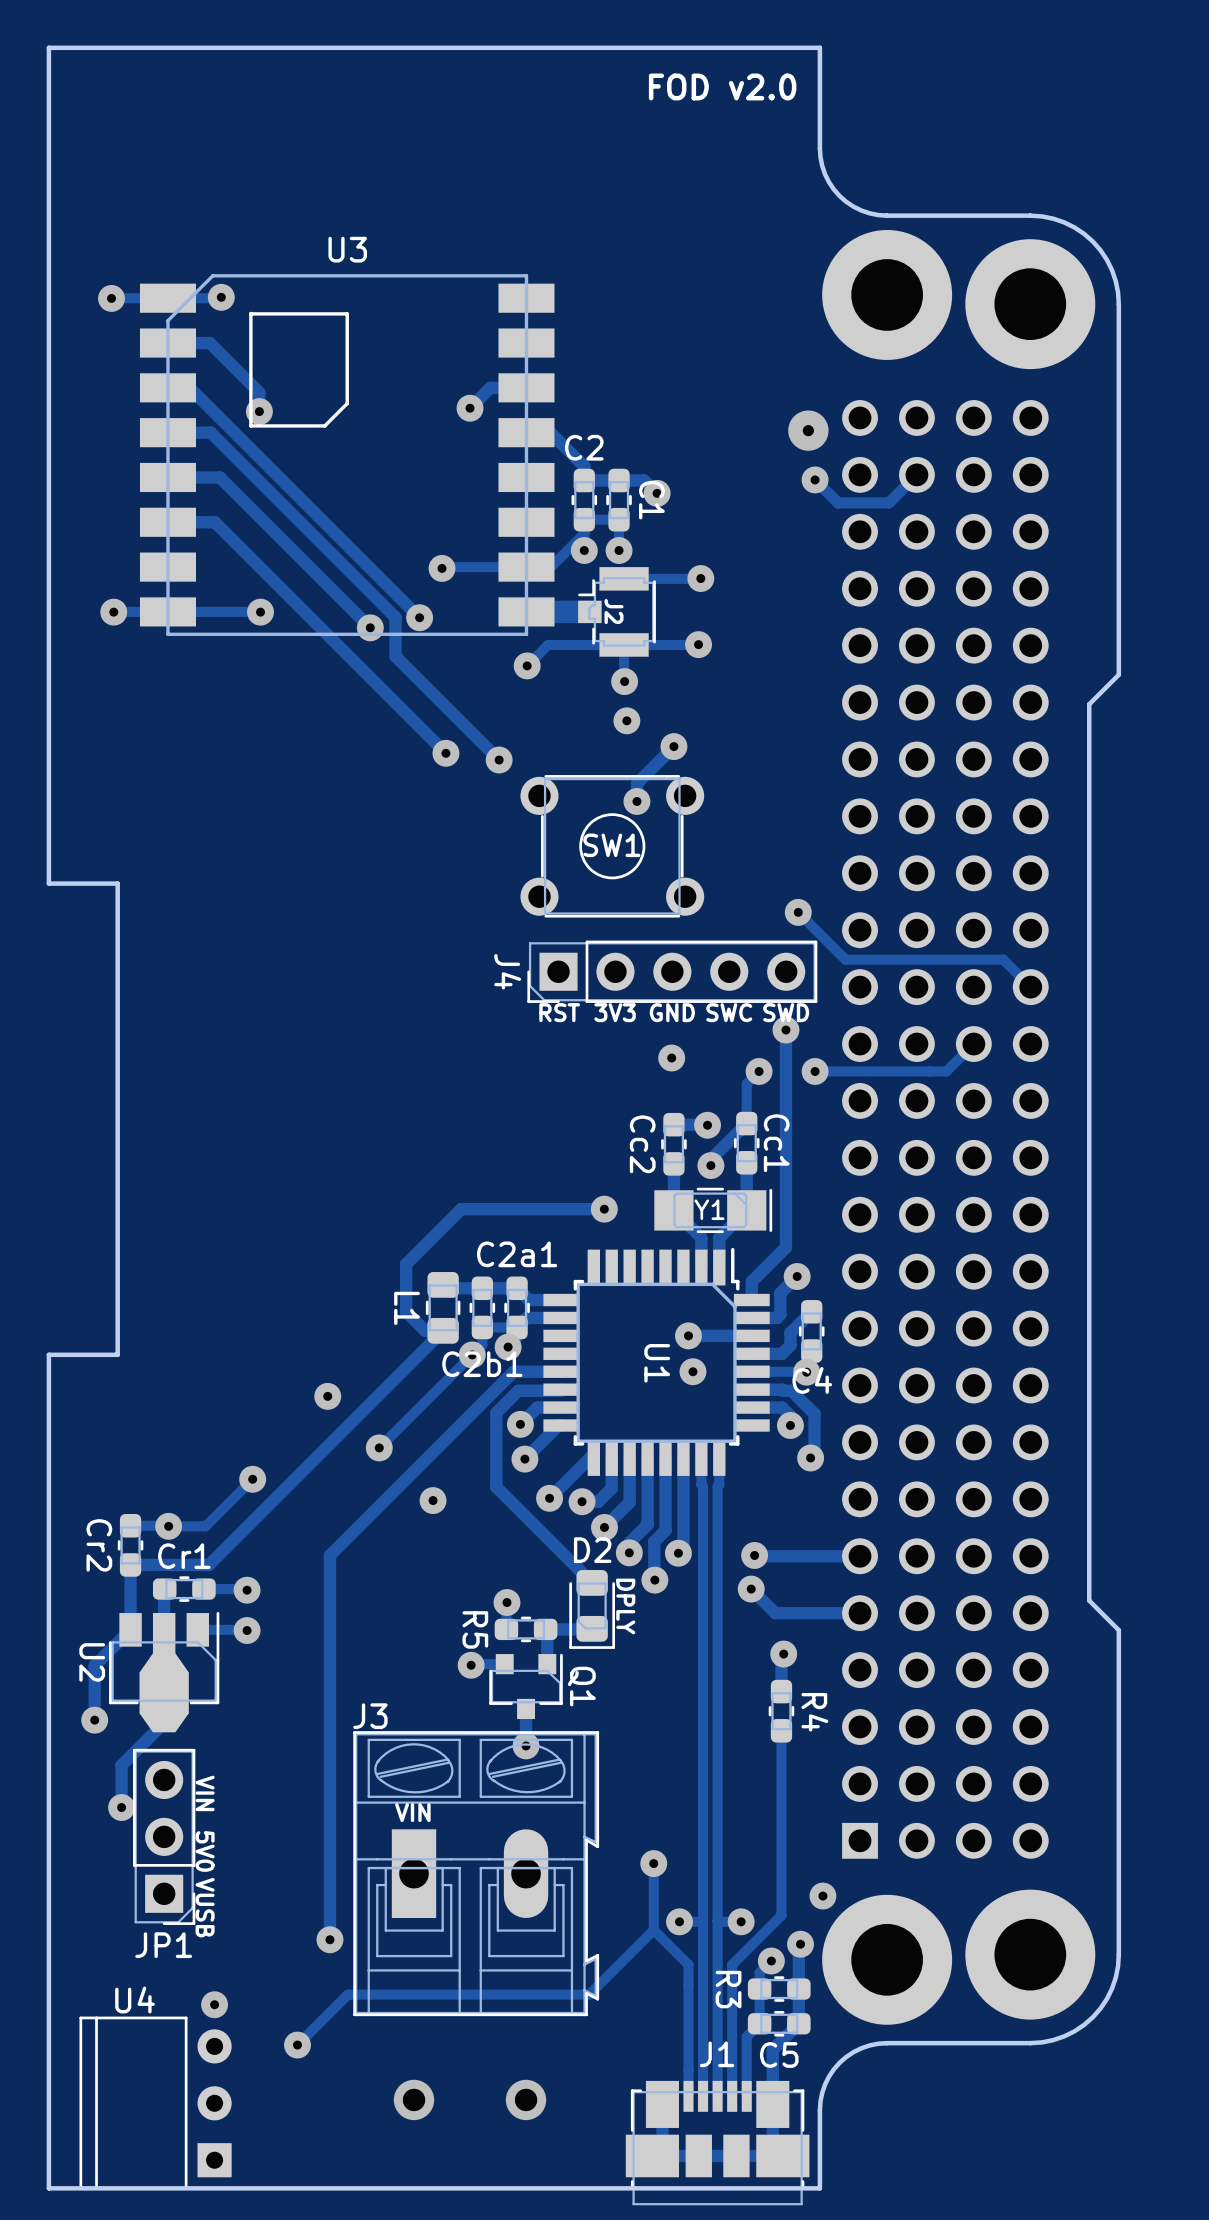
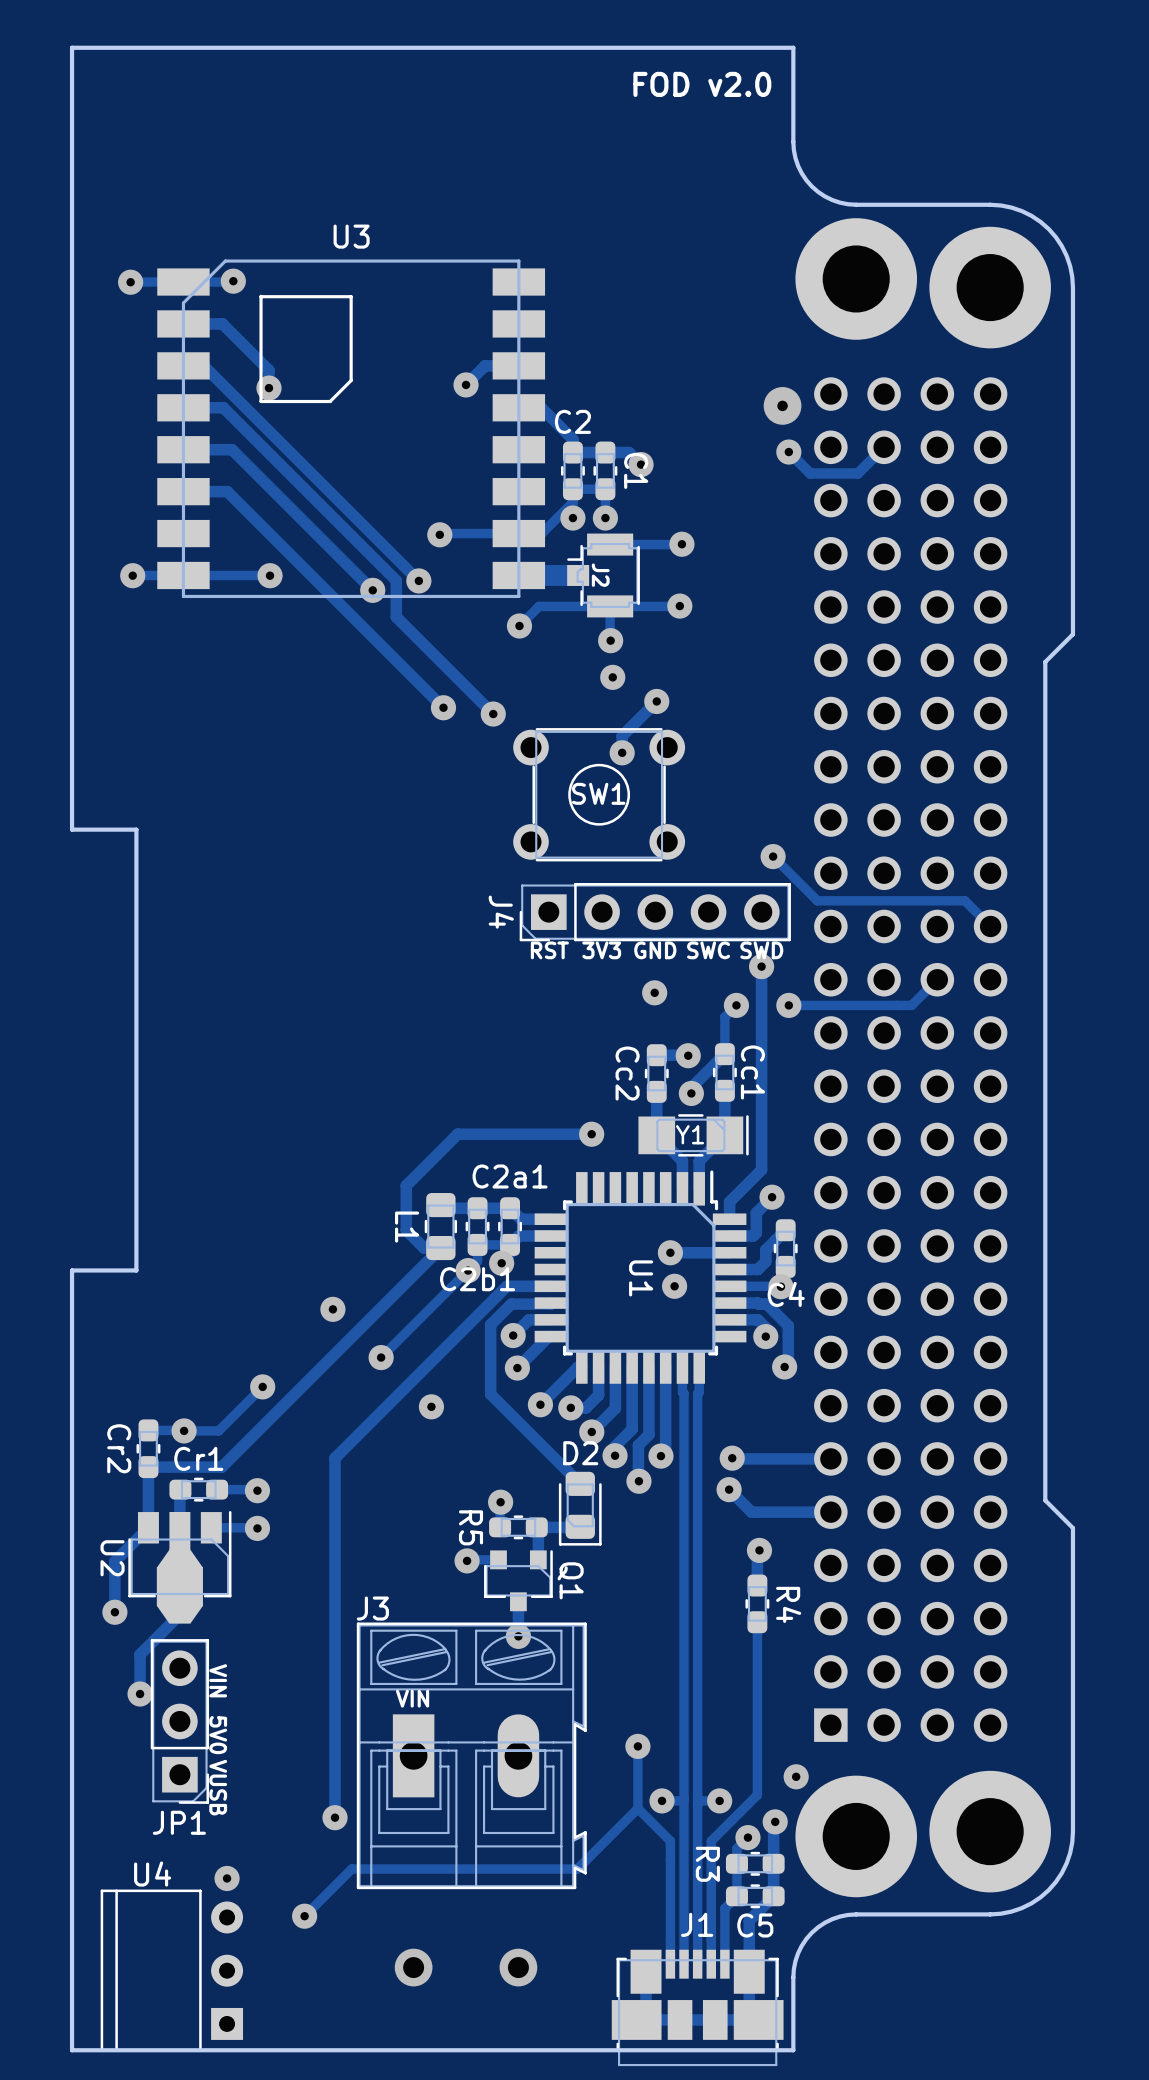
text: DPLY (625, 1606) -> none

